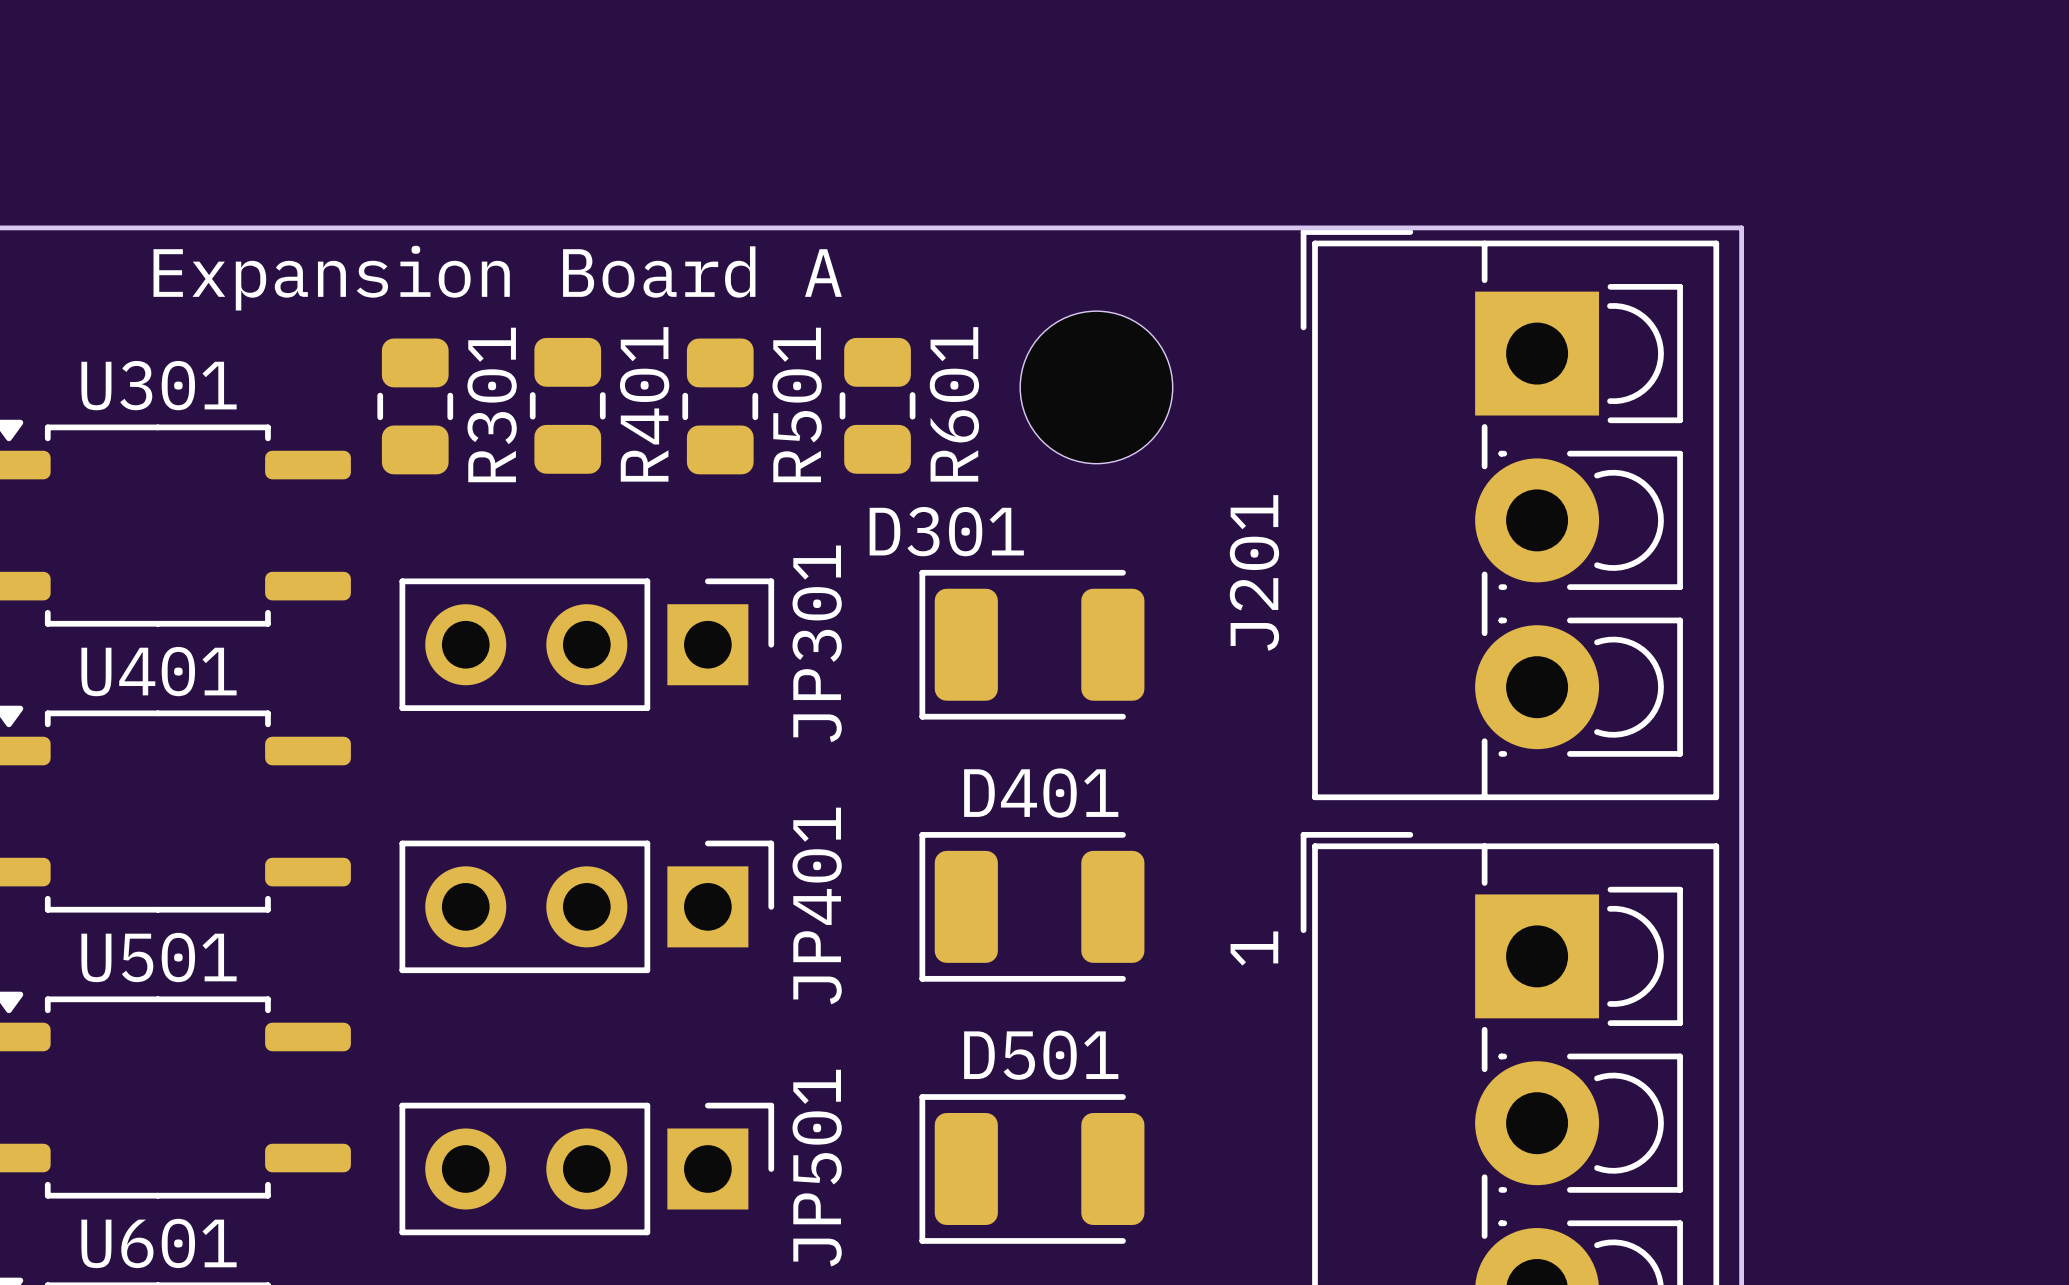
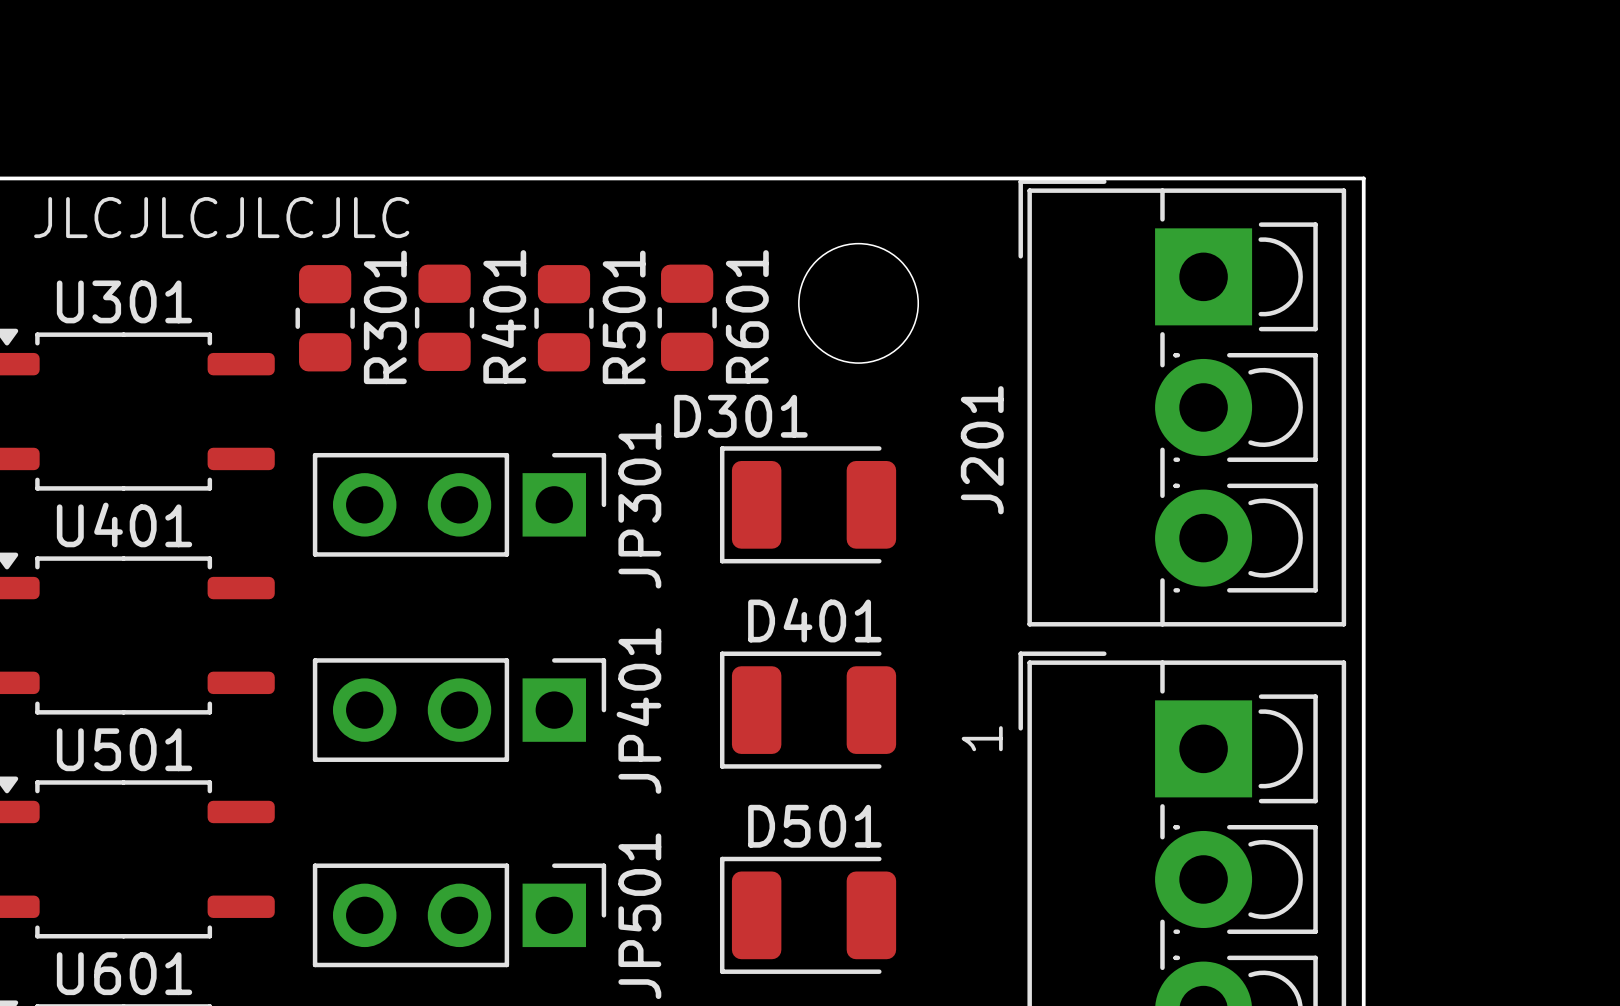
text: none -> JLCJLCJLCJLC (221, 217)
text: Expansion Board A (497, 278) -> none

